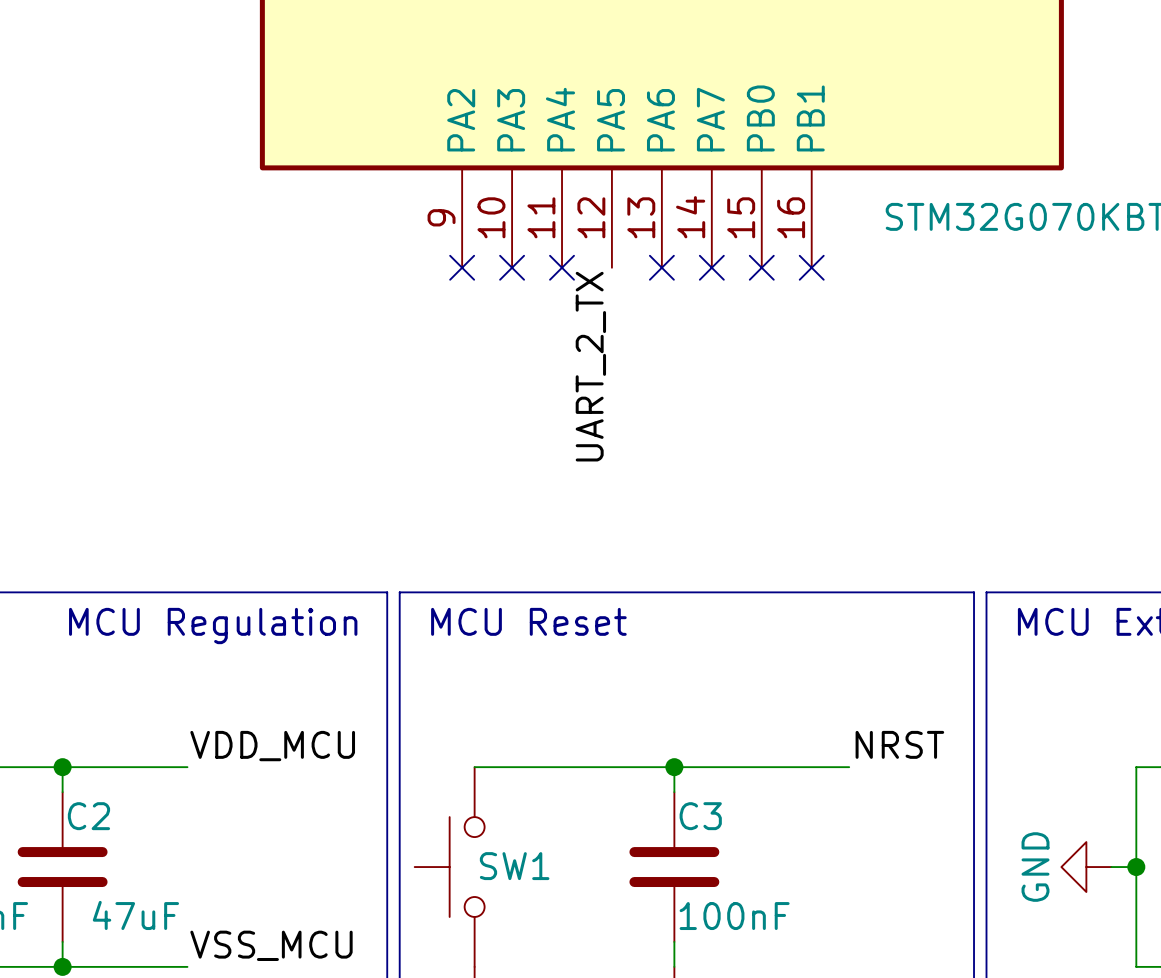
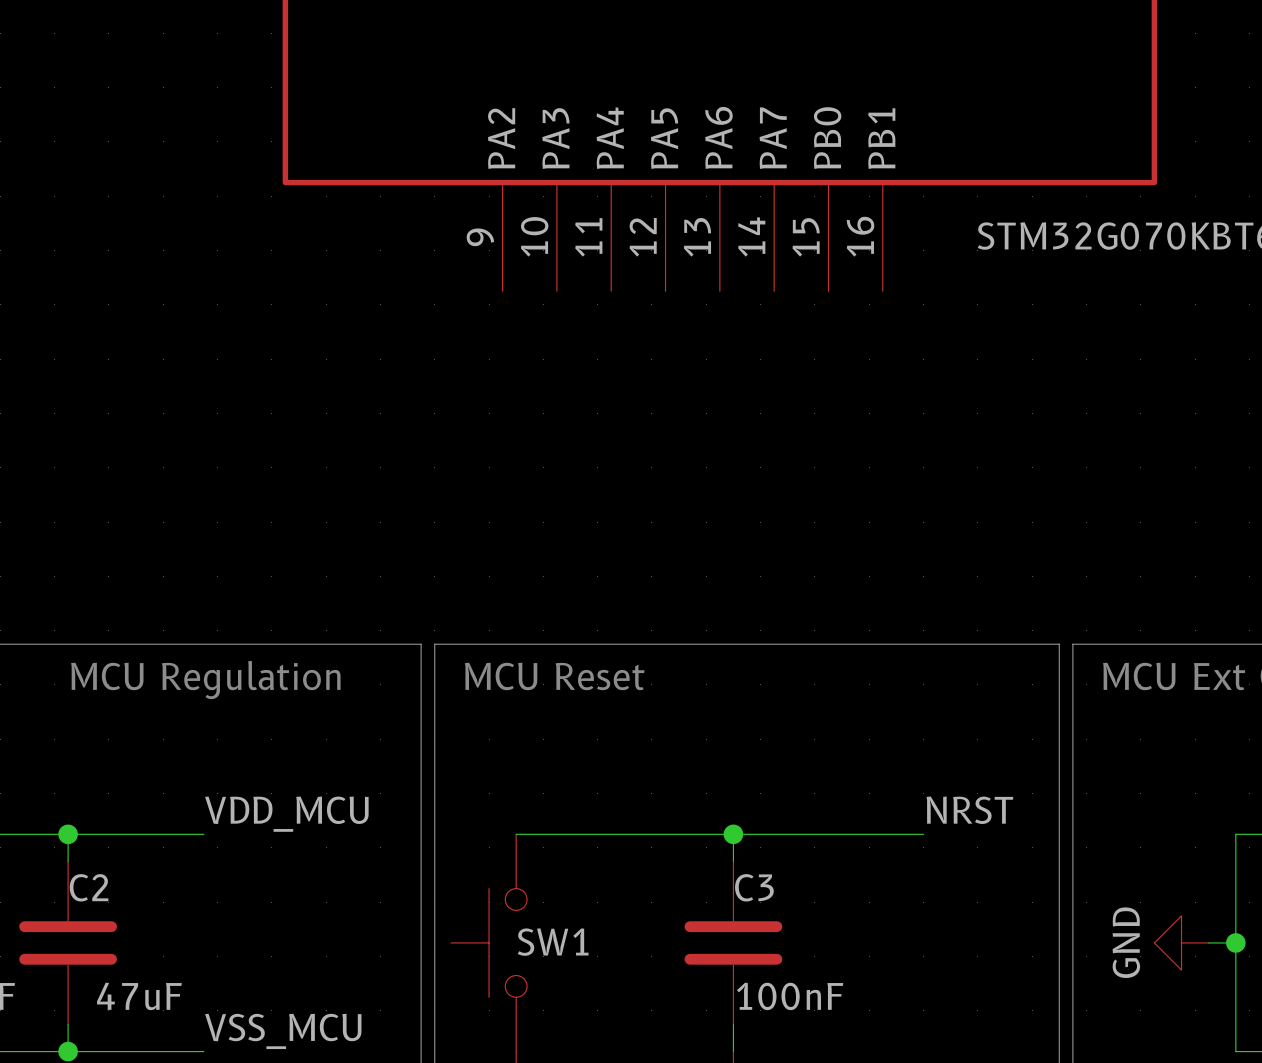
no-connect mark: (462, 267) -> none
no-connect mark: (512, 267) -> none
no-connect mark: (562, 267) -> none
no-connect mark: (661, 267) -> none
no-connect mark: (711, 267) -> none
no-connect mark: (761, 267) -> none
no-connect mark: (811, 267) -> none
label: UART_2_TX (590, 366) -> none

